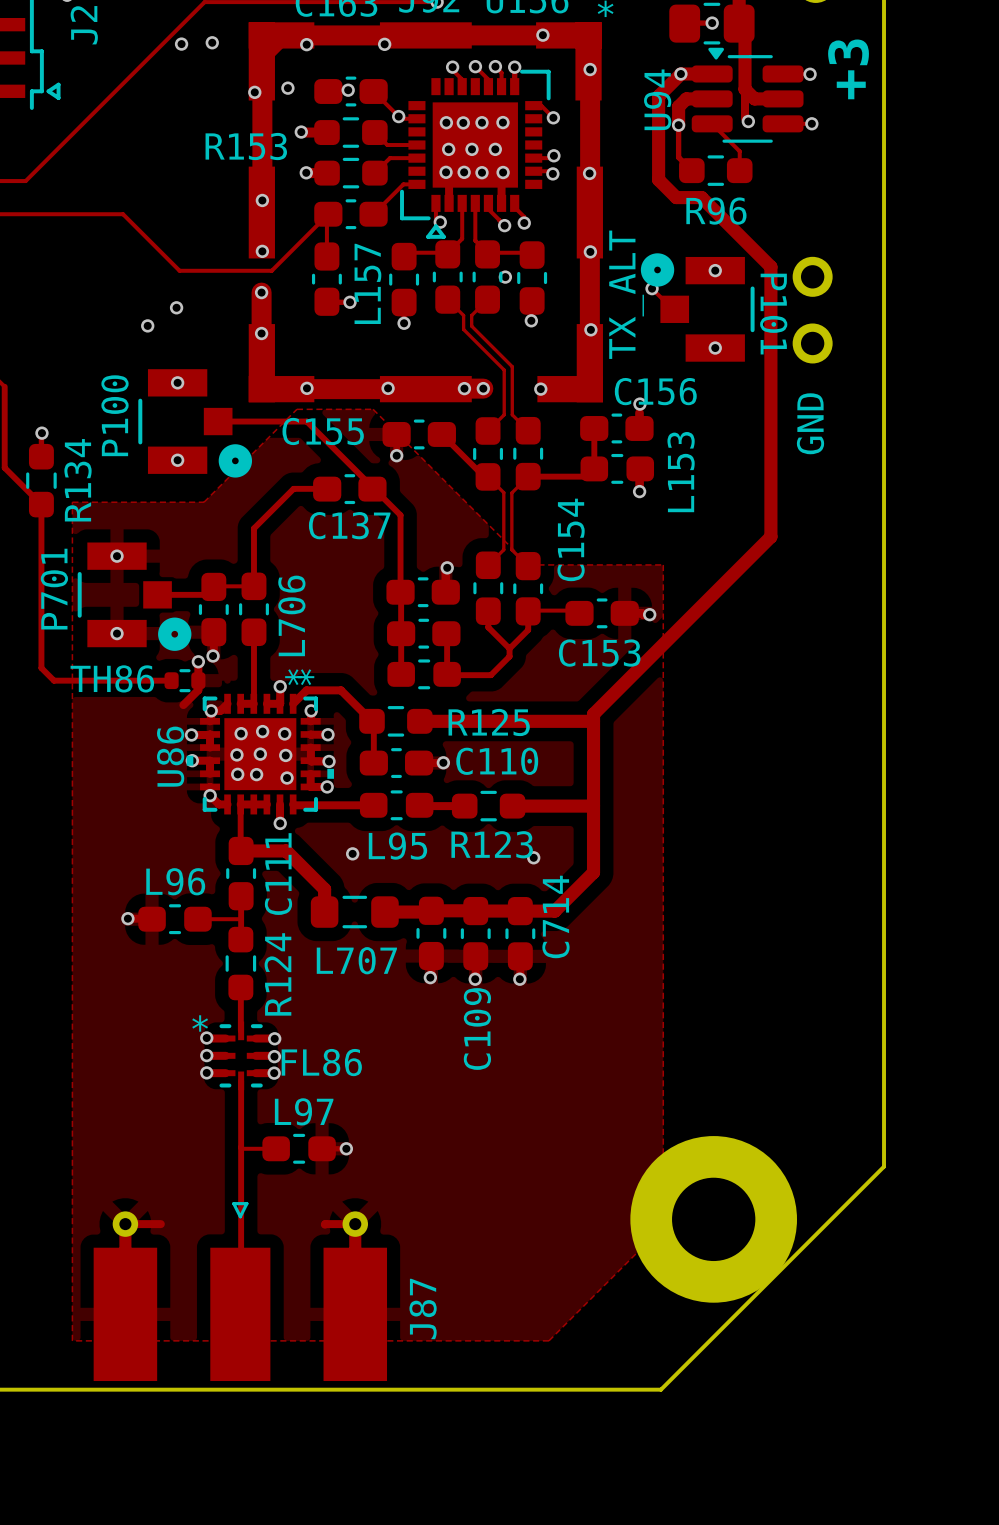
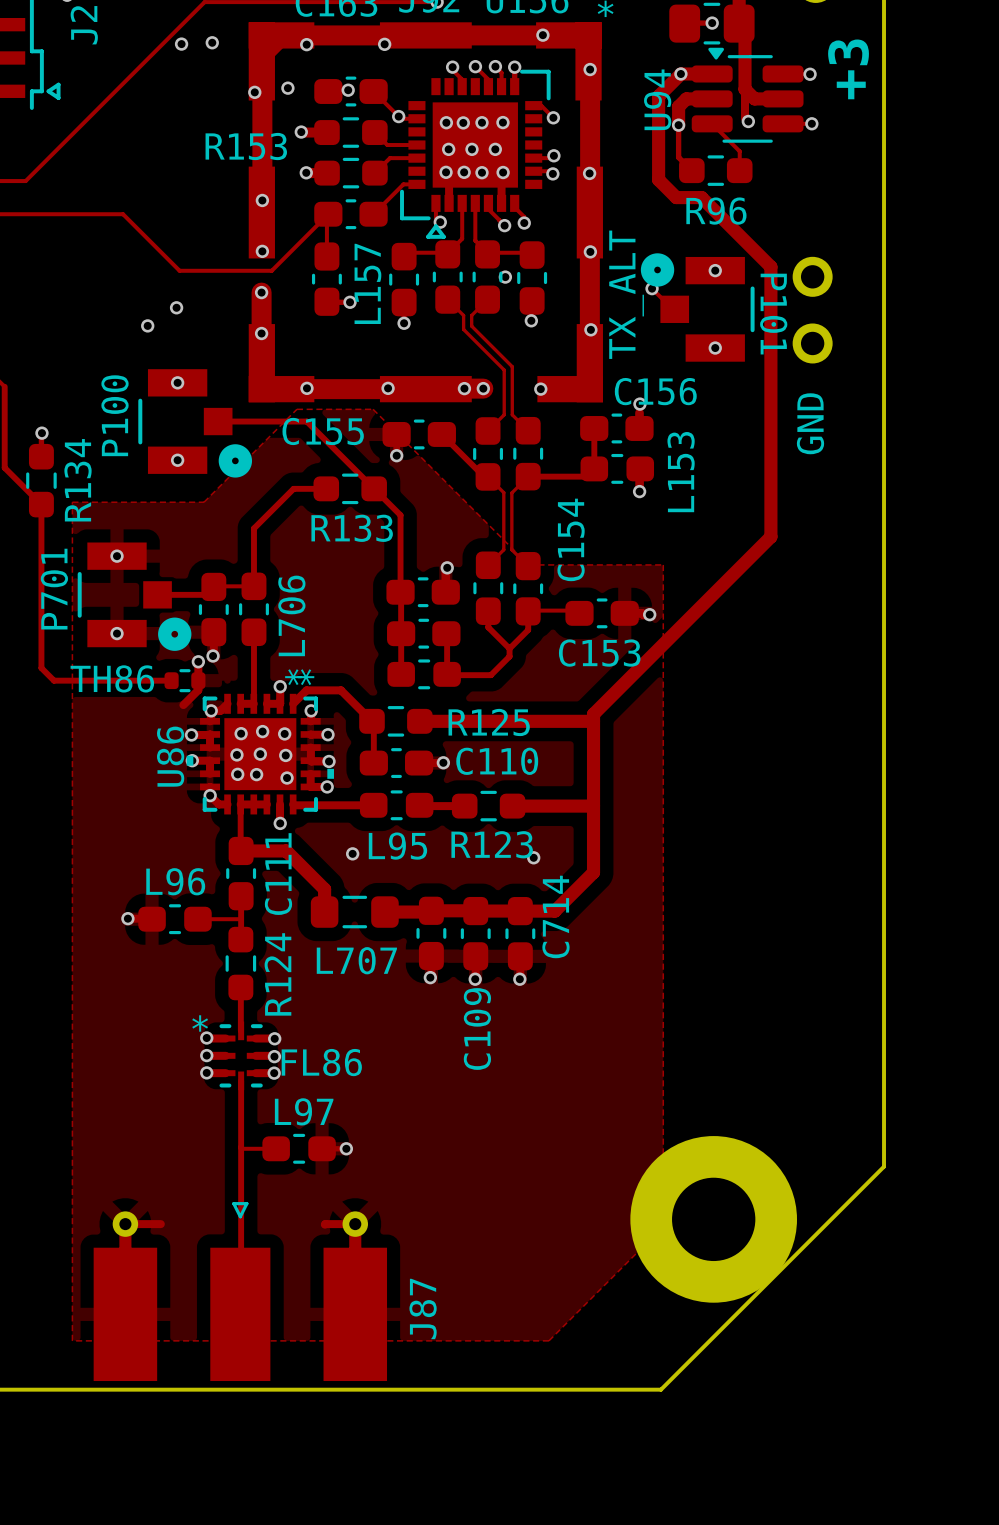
R133: none -> (350, 488)
C137: (349, 489) -> none

